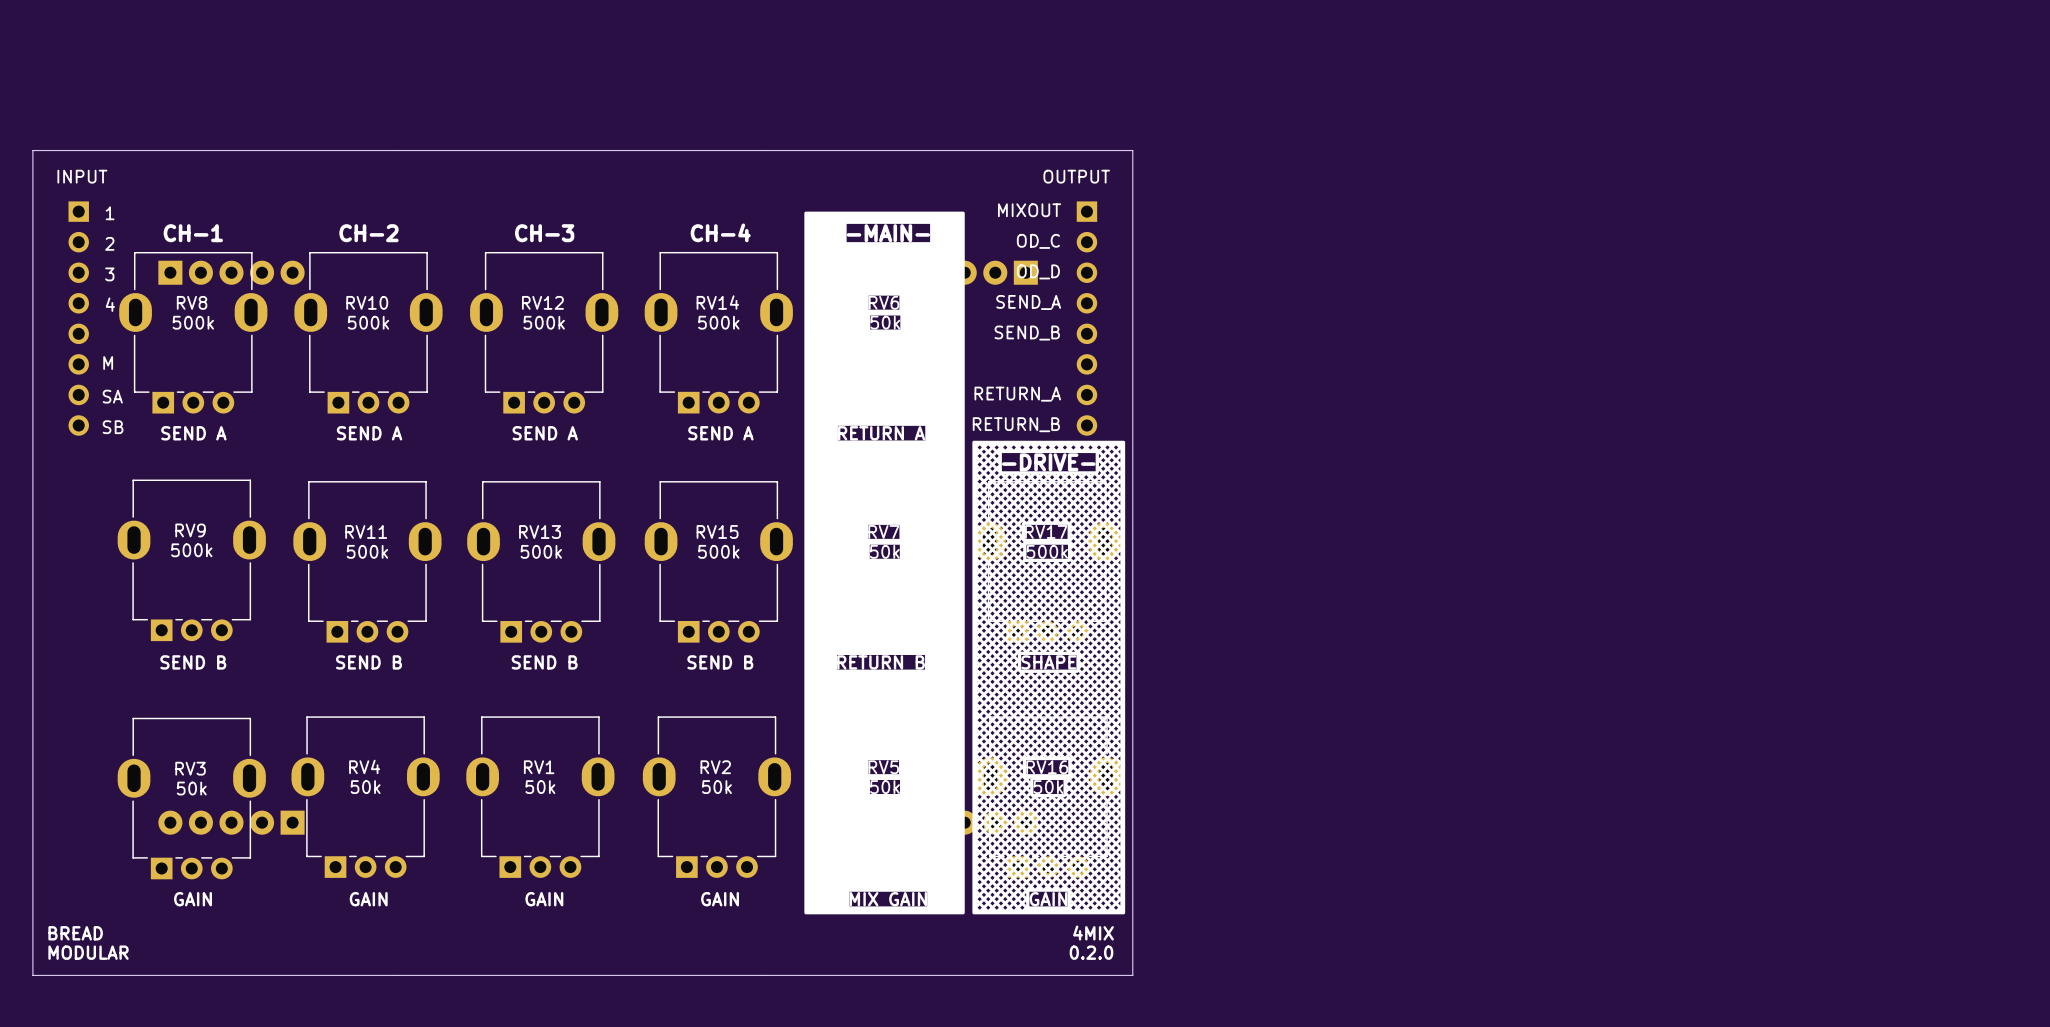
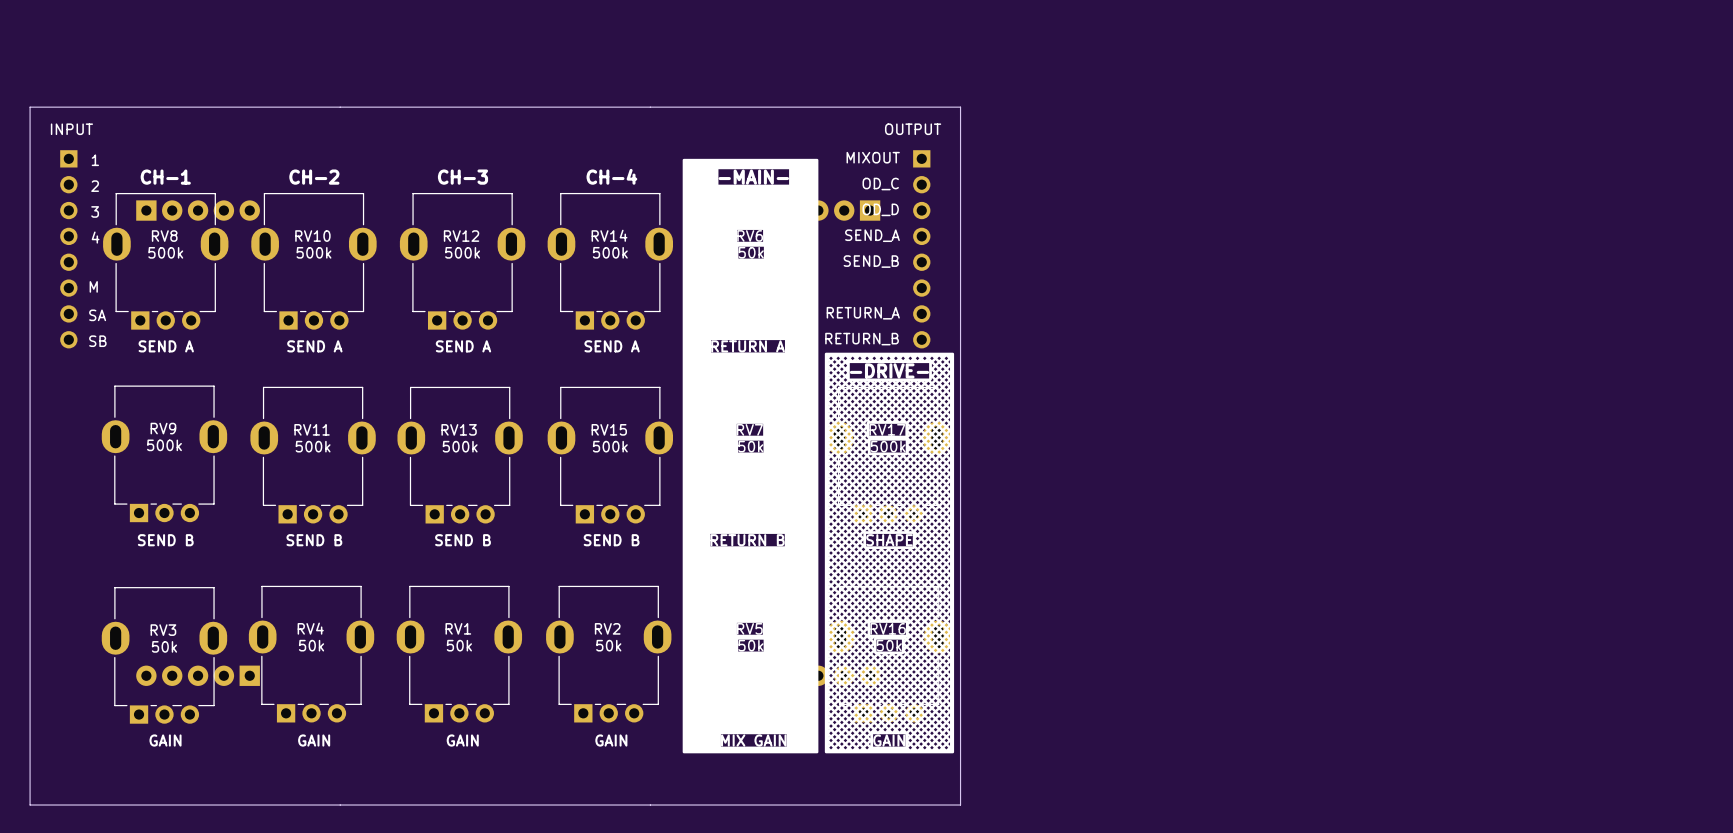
text: BREAD (75, 933) -> none
text: 4MIX (1093, 933) -> none
text: MODULAR (88, 952) -> none
text: 0.2.0 (1091, 952) -> none

